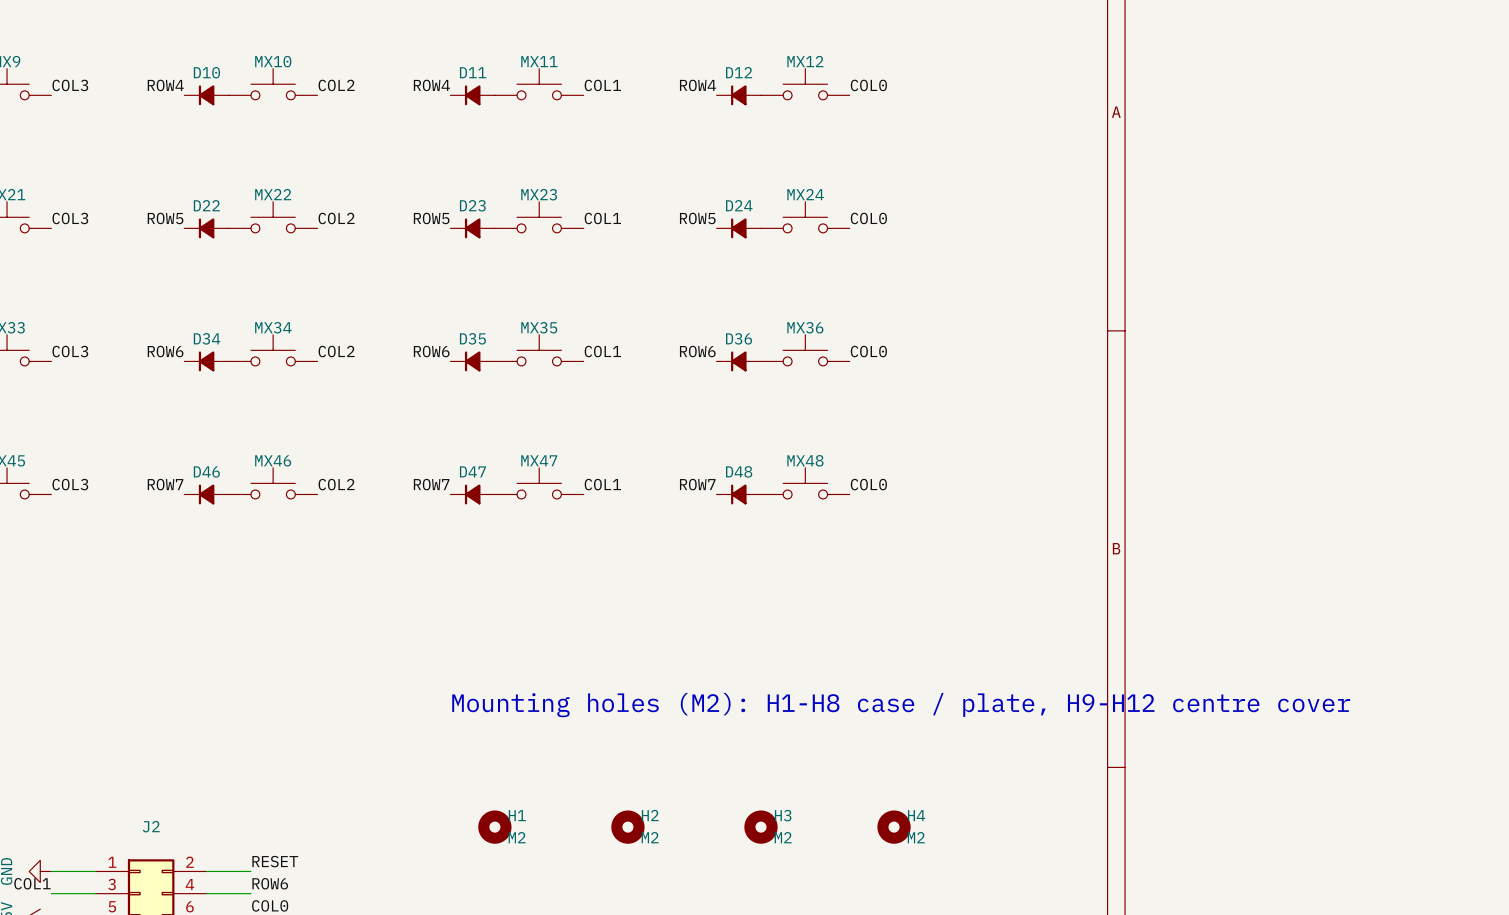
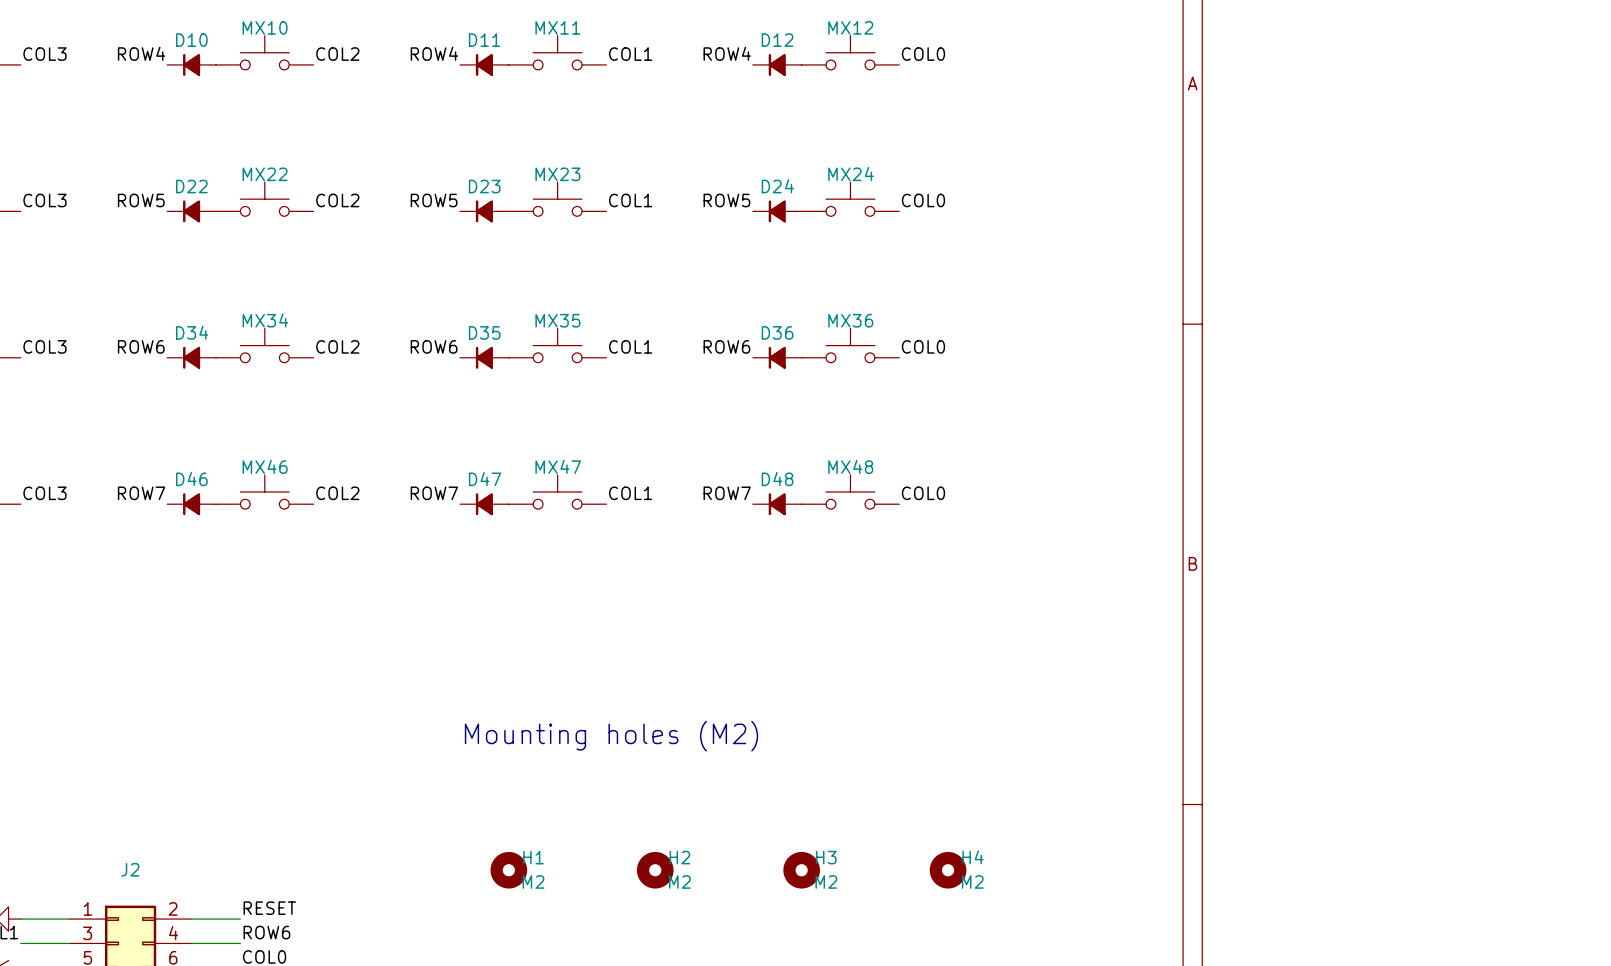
text: Mounting holes (M2): H1-H8 case / plate, H9-H12 centre cover (901, 705) -> Mounting holes (M2) (611, 736)

